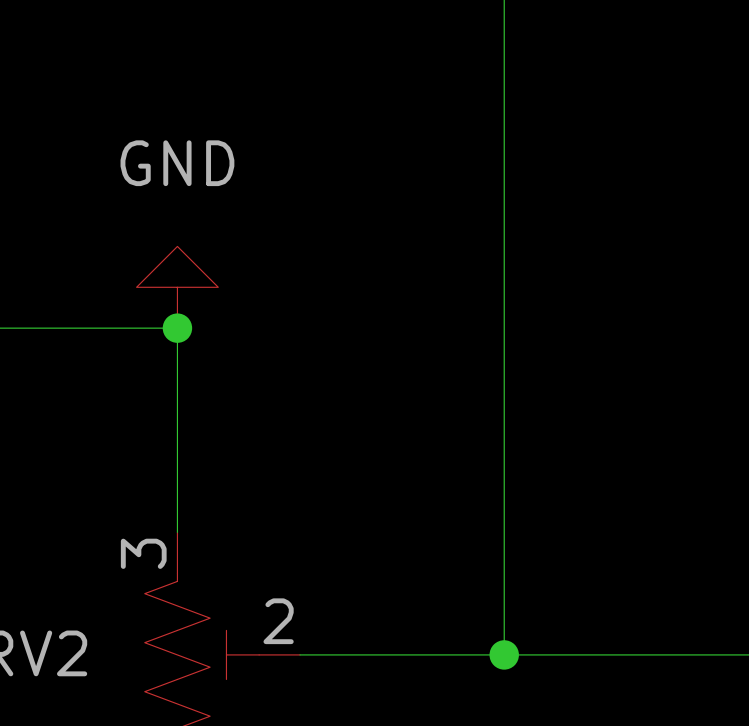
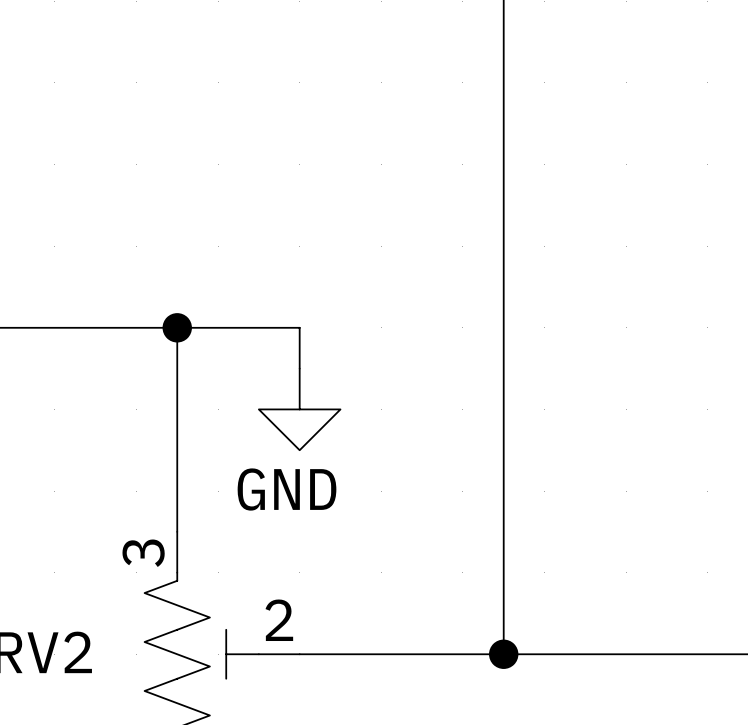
power symbol rotation: 0° (177, 287) -> 180° (299, 409)
power symbol position: GND (177, 287) -> GND (299, 409)
wire: none -> (177, 327) (299, 327) (299, 368)

